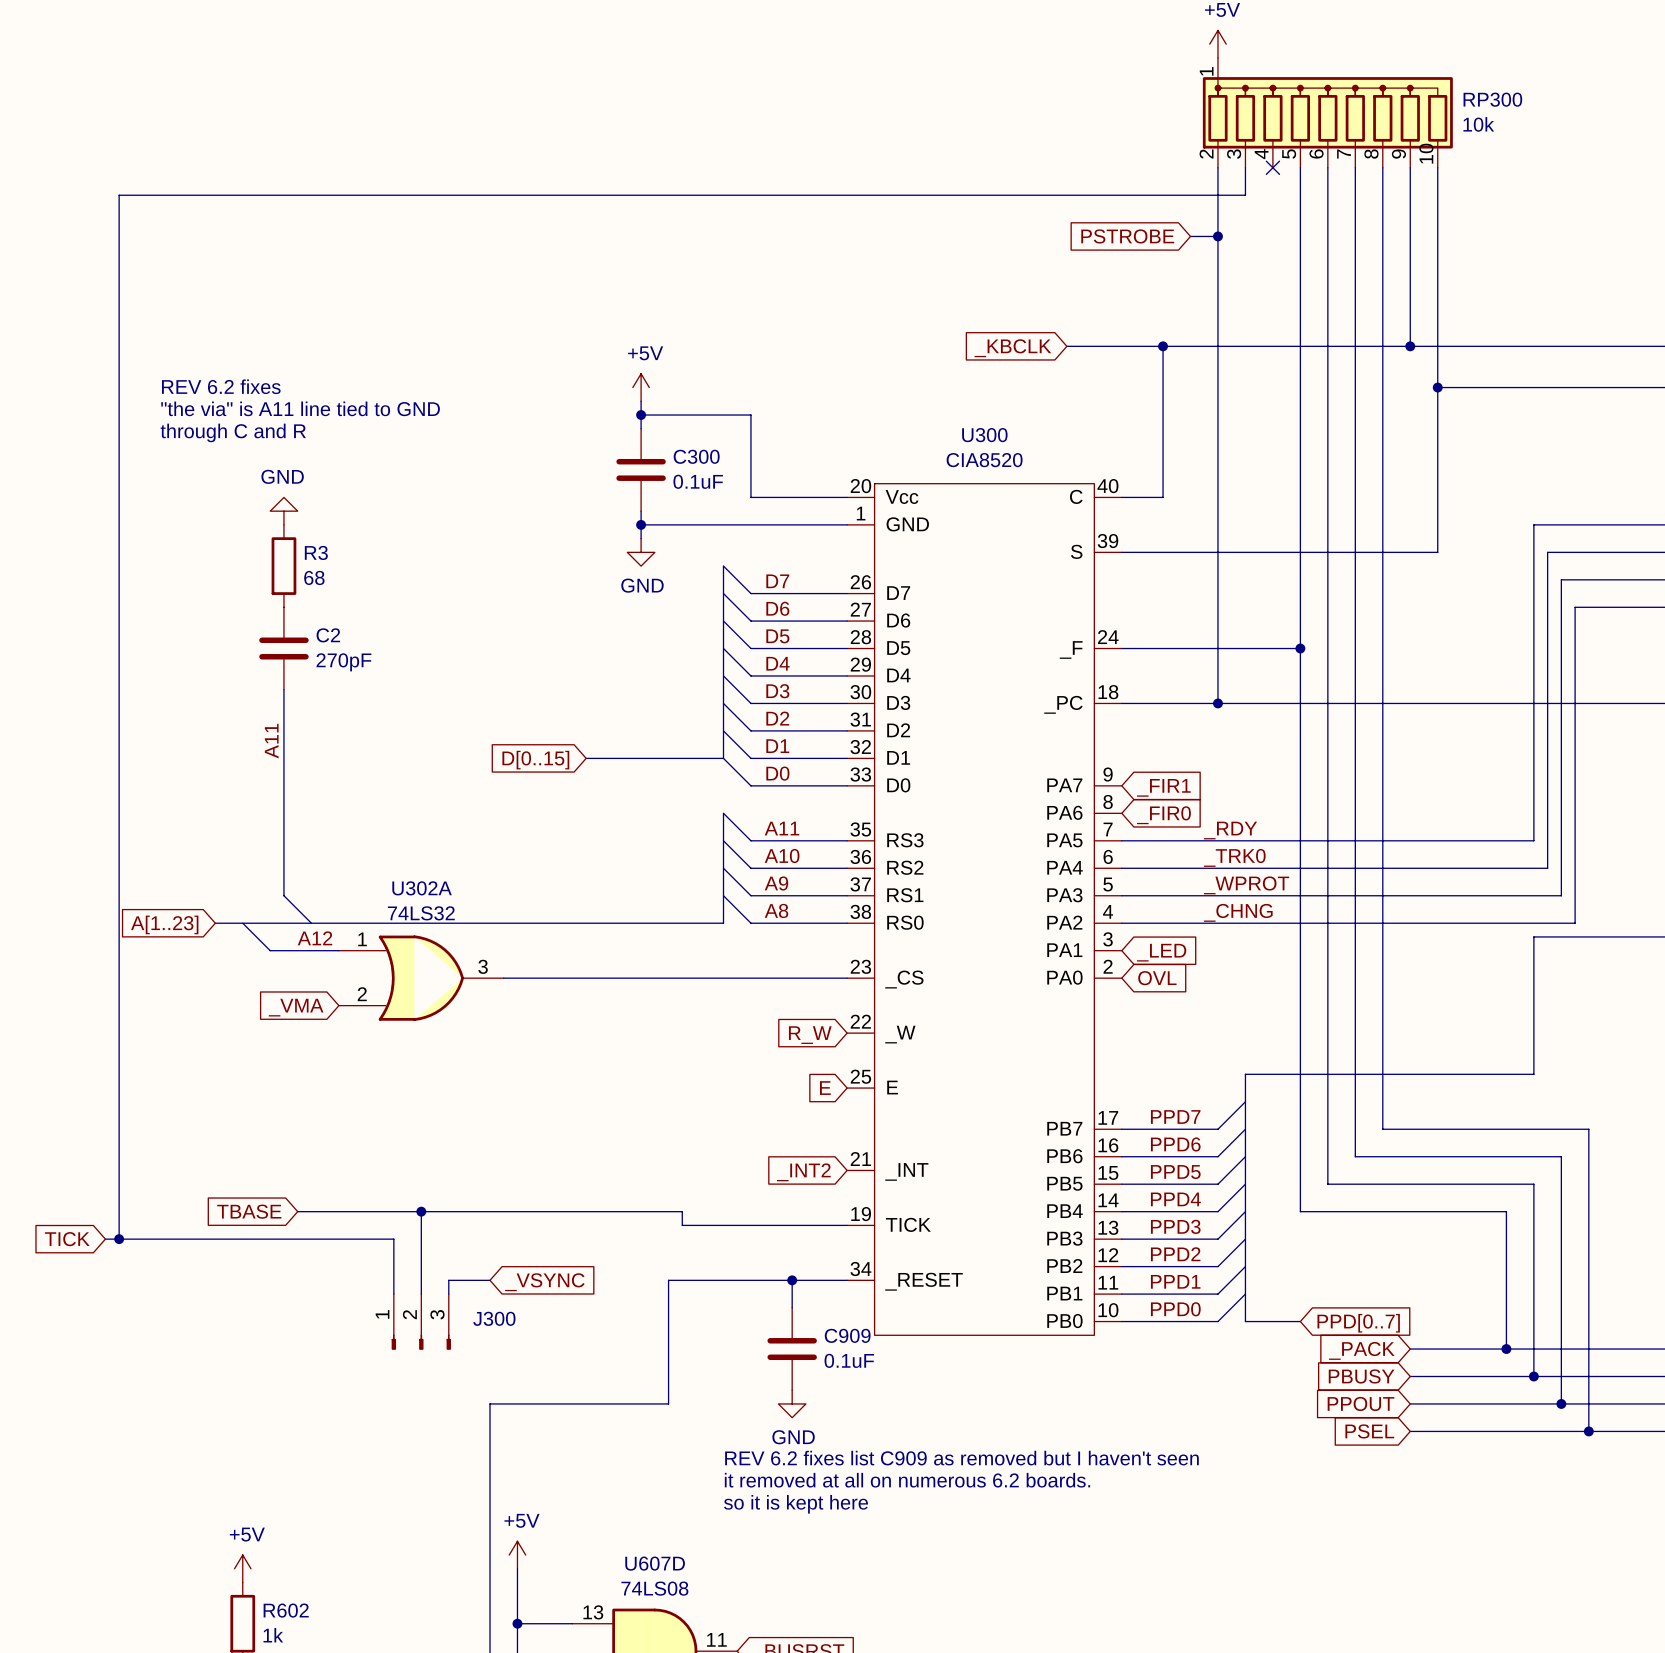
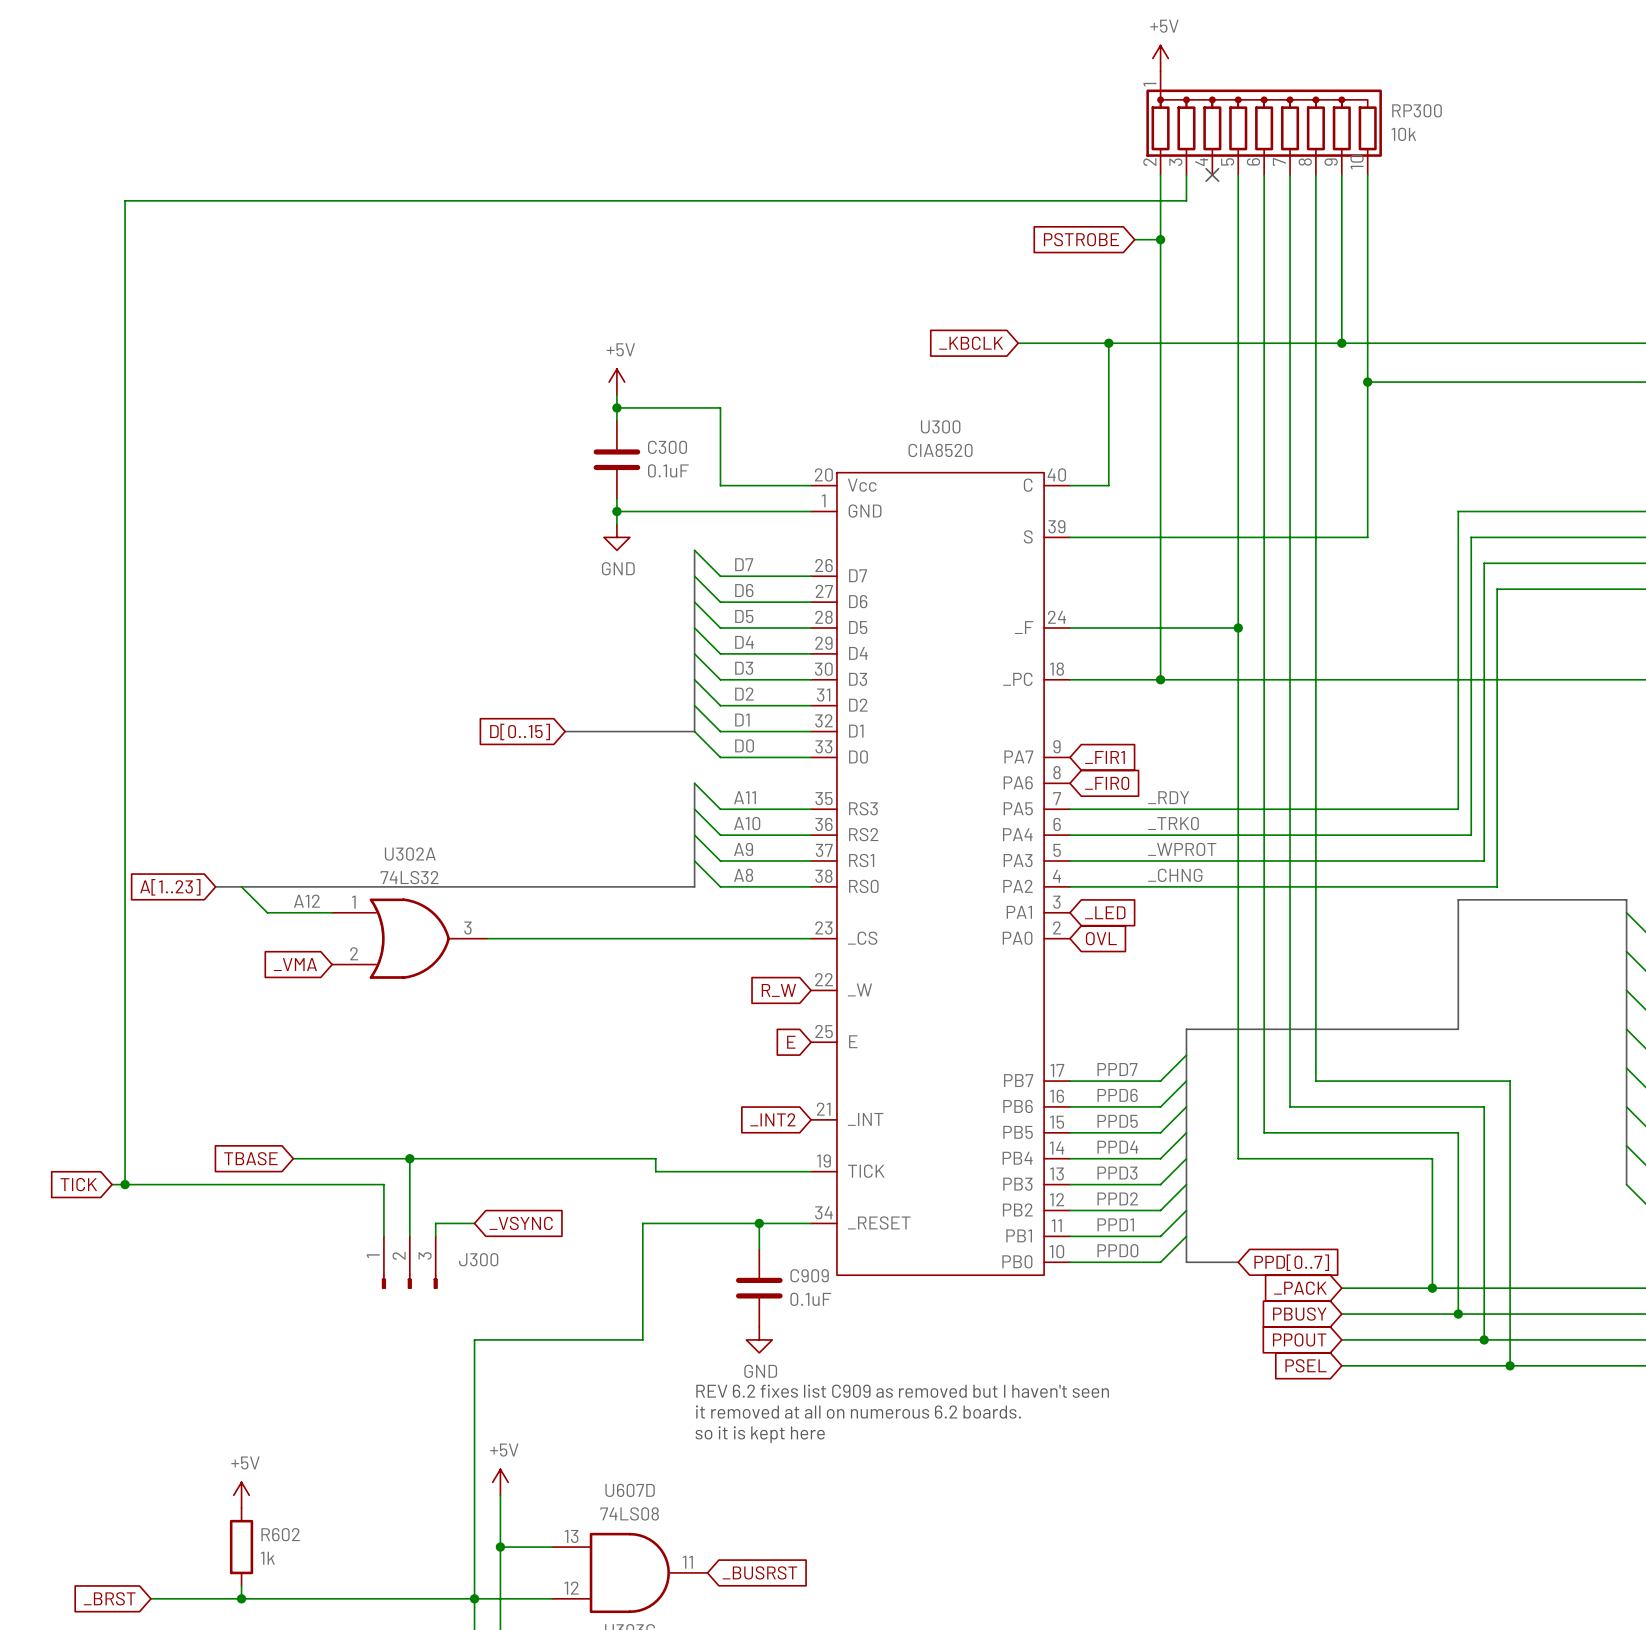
text: REV 6.2 fixes (221, 386) -> none
text: "the via" is A11 line tied to GND (300, 408) -> none
text: through C and R (233, 432) -> none
power symbol: GND (283, 511) -> none
R3: 68 (283, 566) -> none
C2: 270pF (283, 648) -> none
wire: (283, 689) (283, 895) (311, 923) -> none
label: A11 (271, 741) -> none

